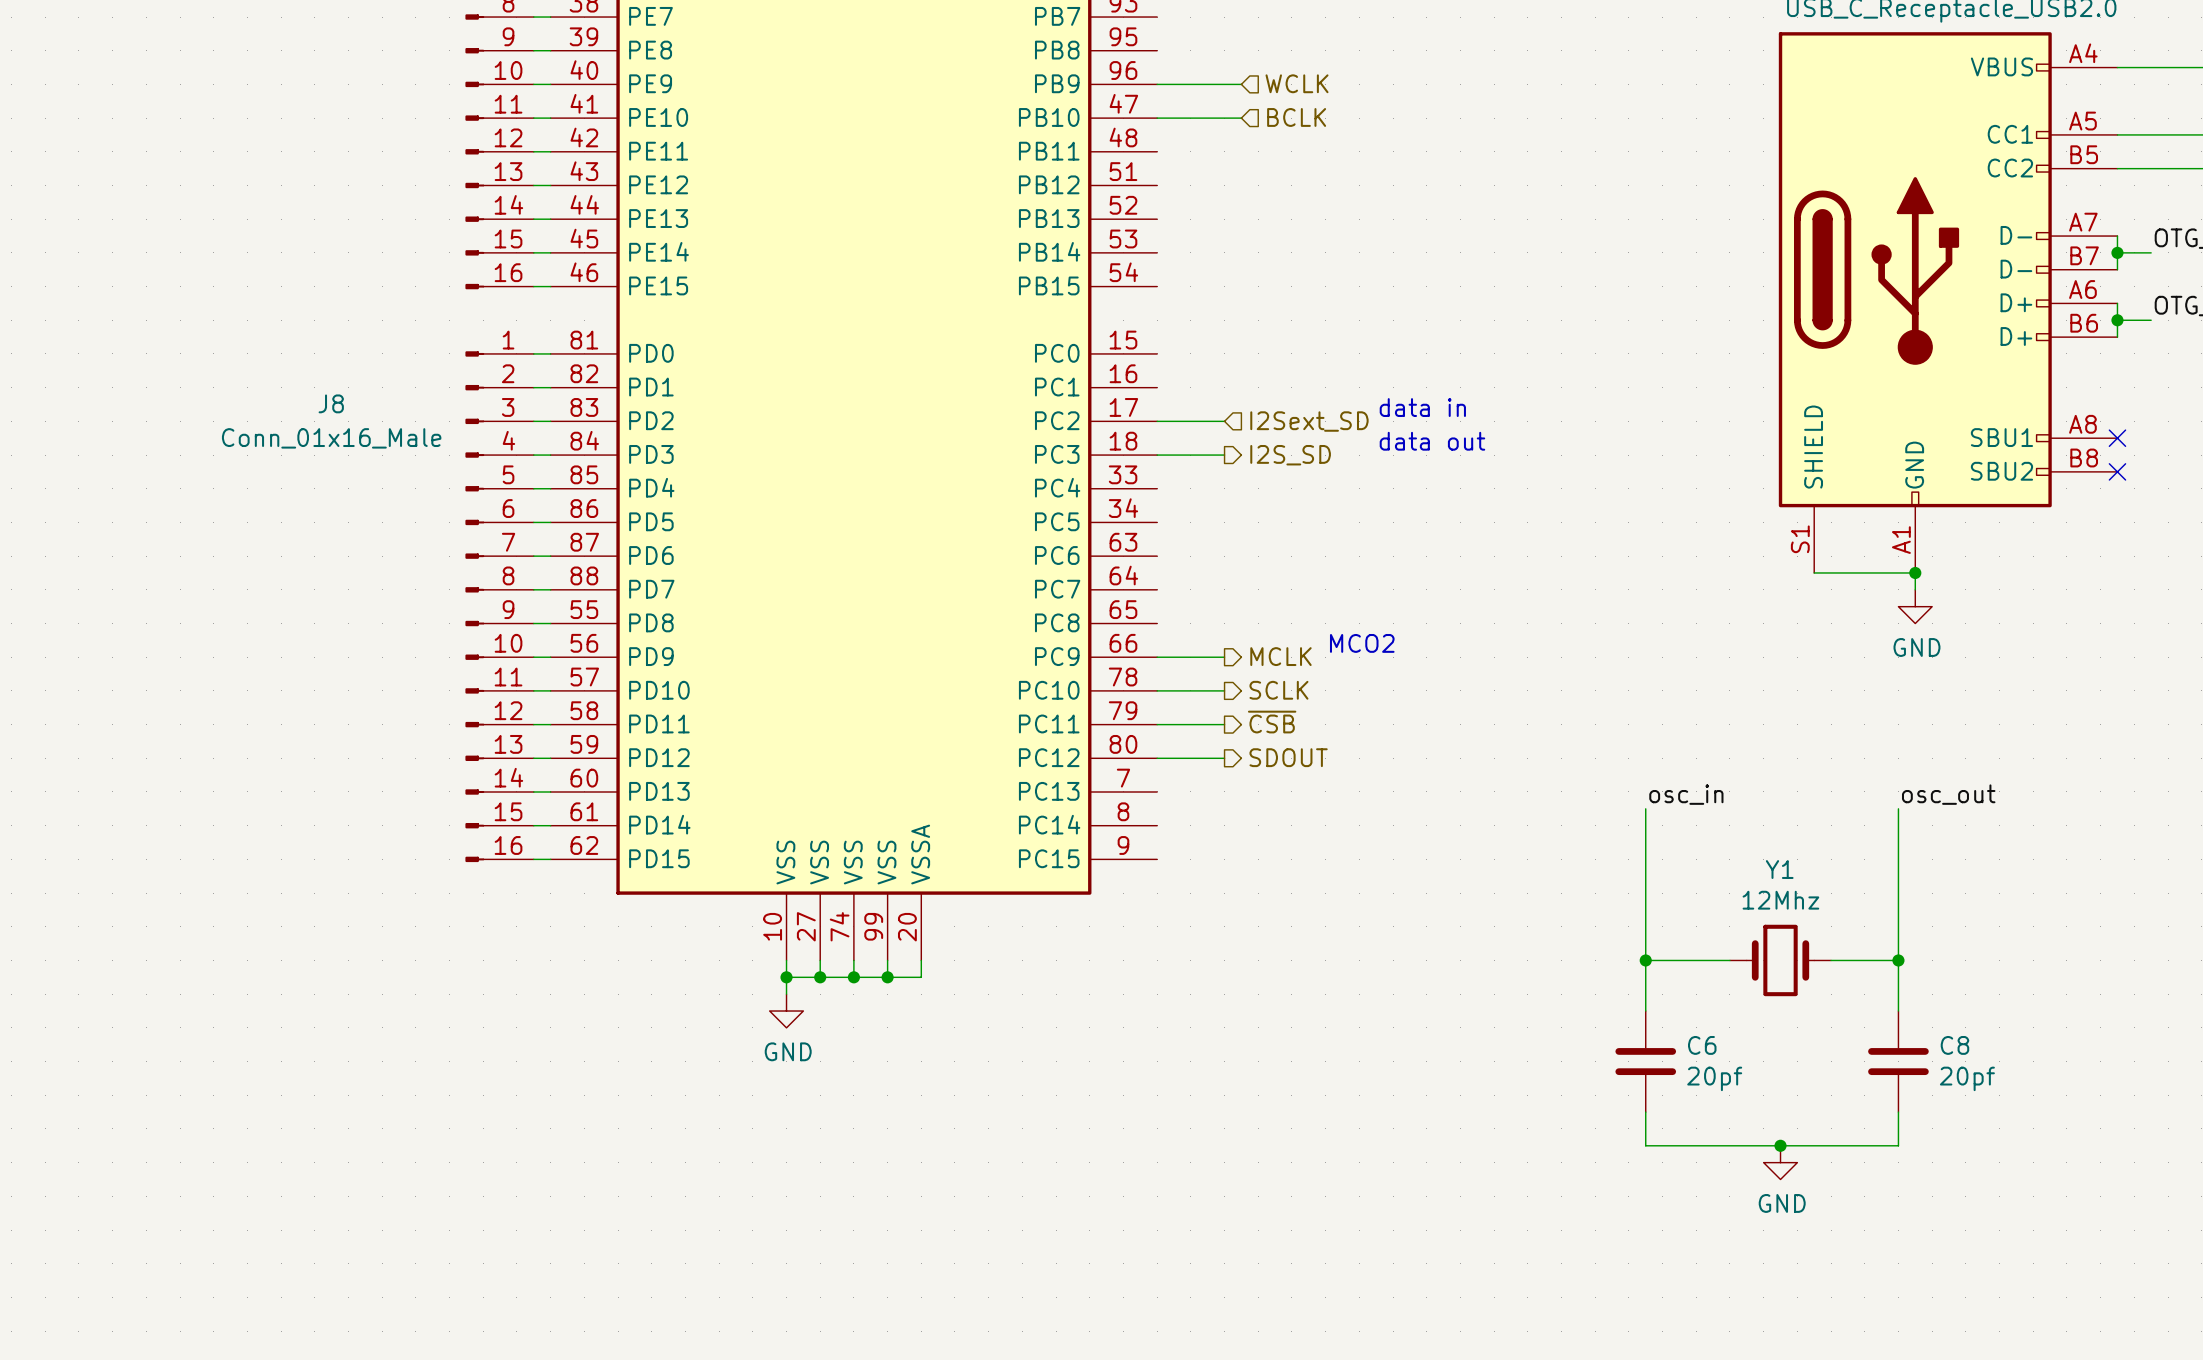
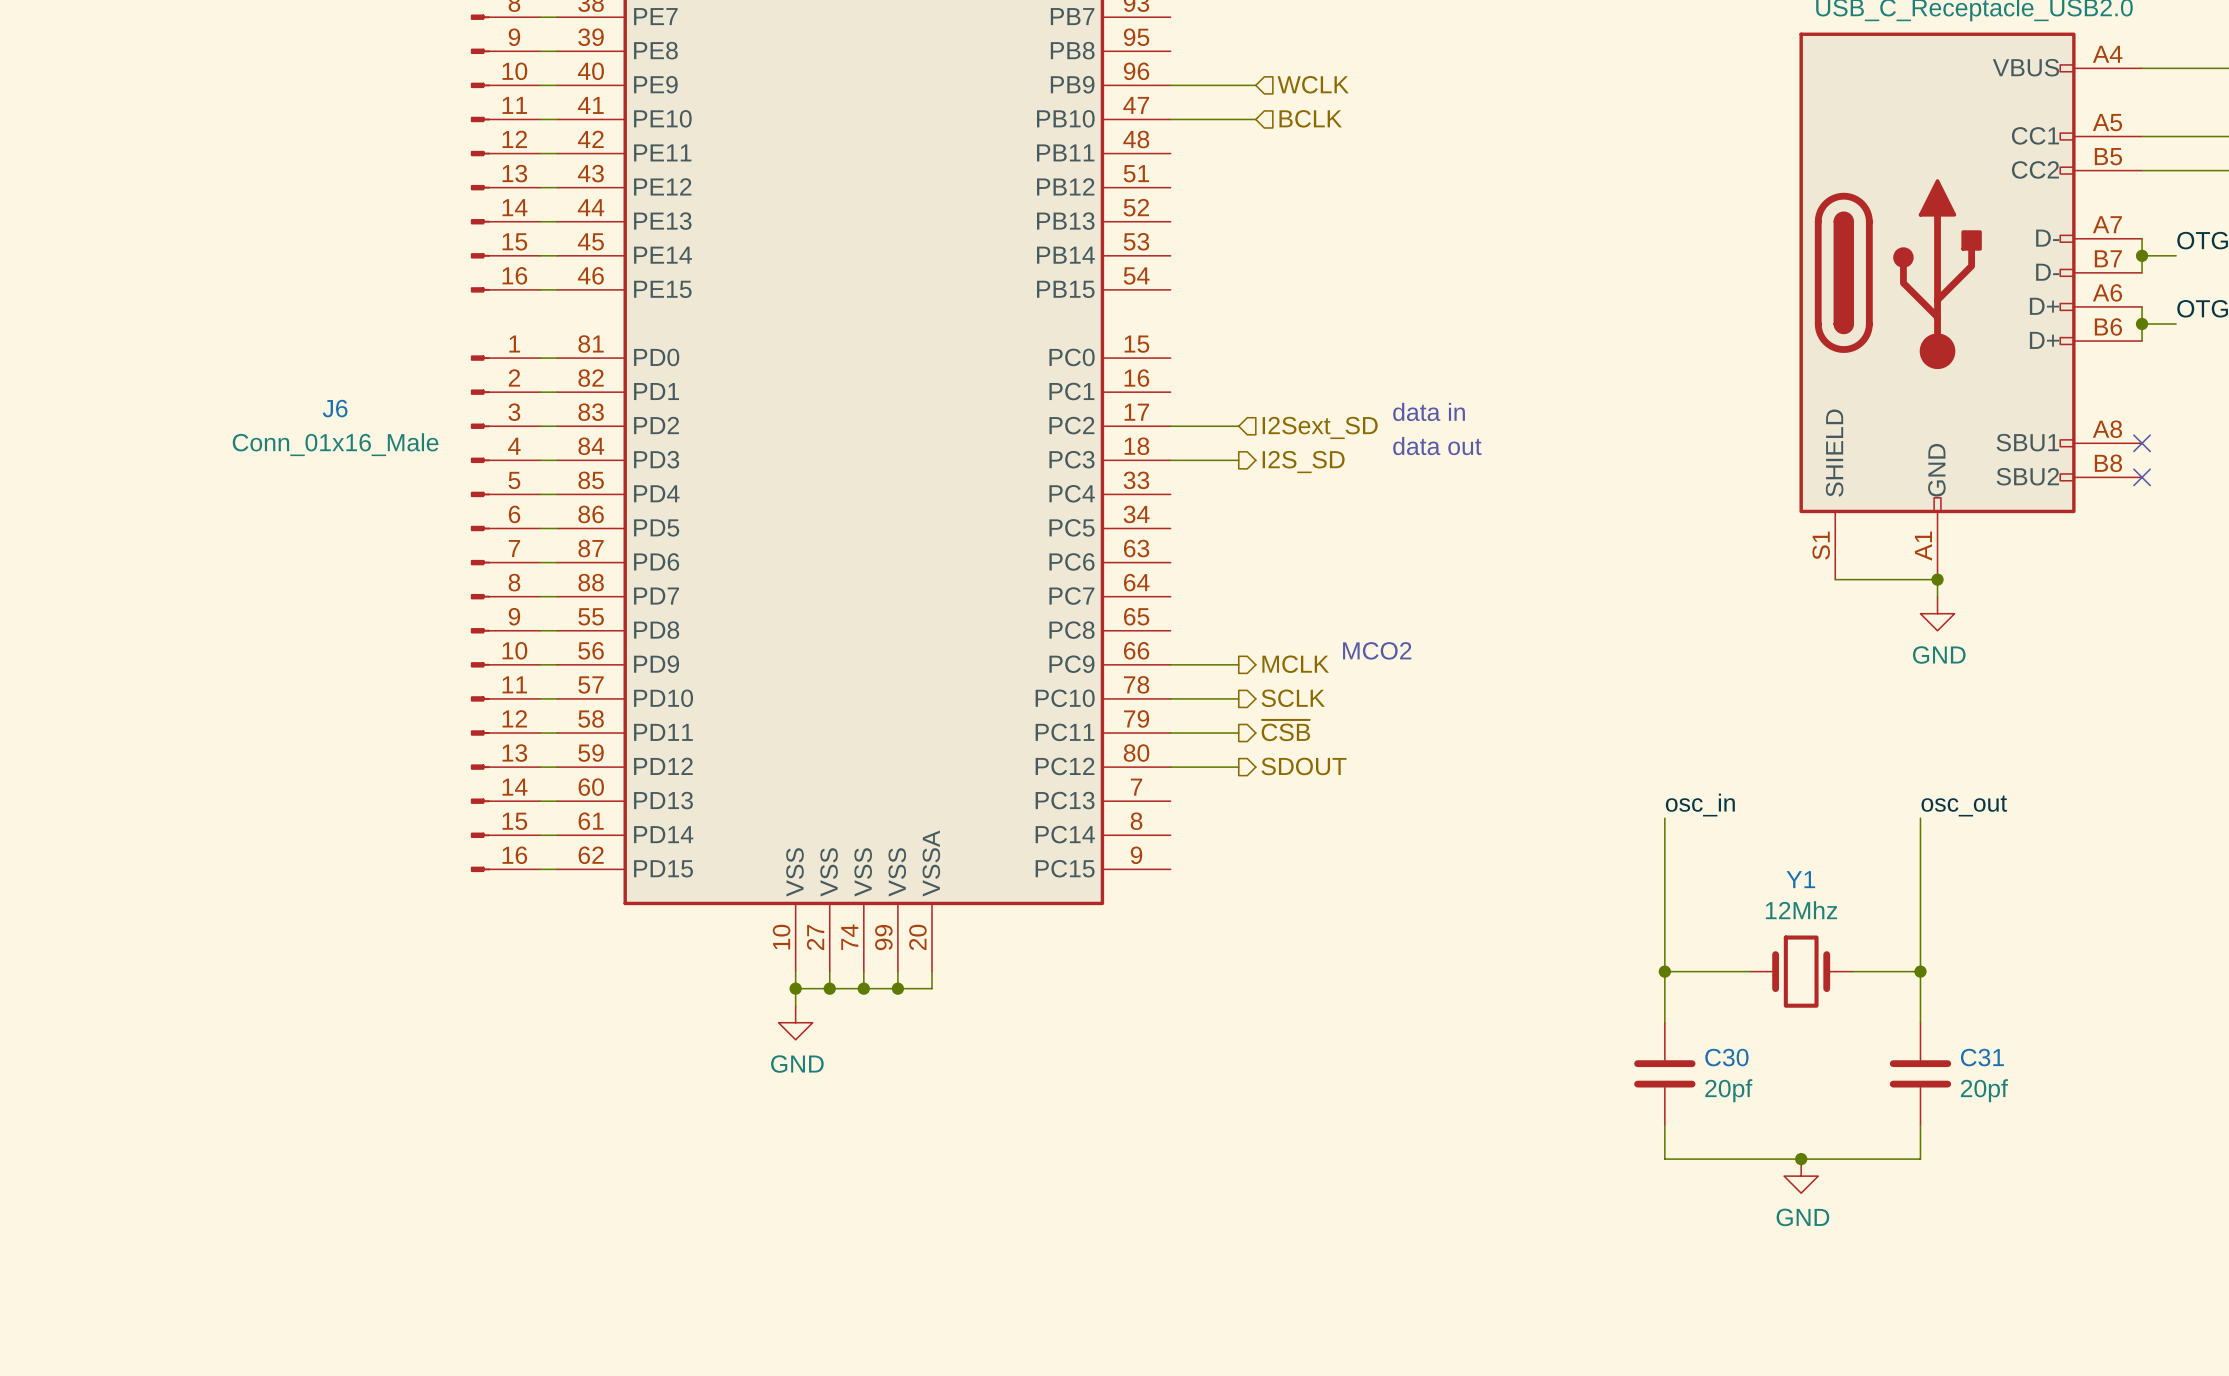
J8 name: J8 (331, 403) -> J6 (335, 408)
C6 name: C6 (1702, 1045) -> C30 (1726, 1057)
C8 name: C8 (1954, 1045) -> C31 (1982, 1057)

